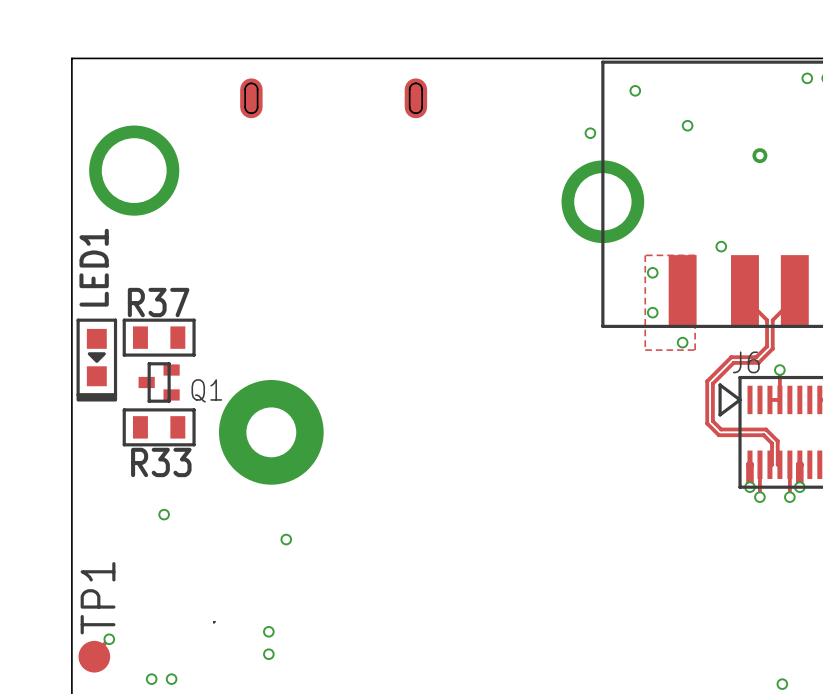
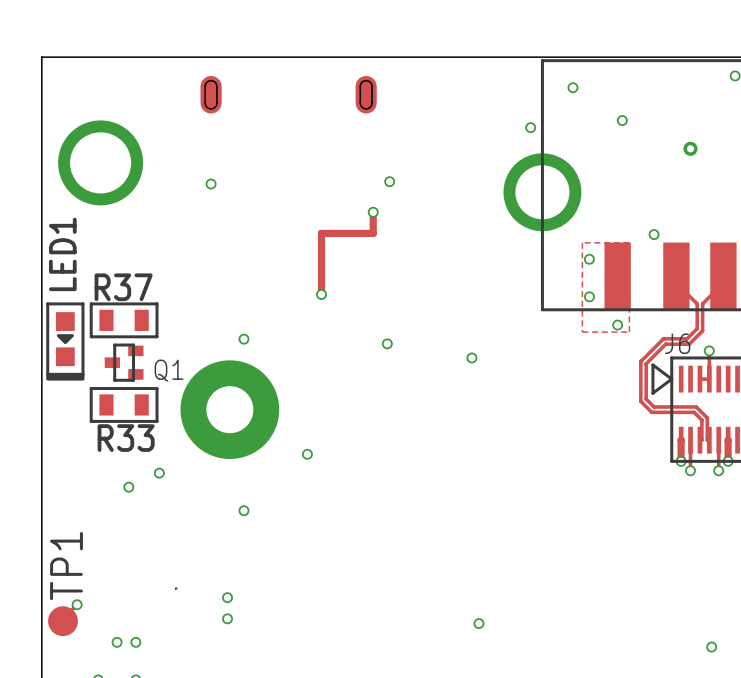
via: none -> (389, 181)
via: none -> (211, 184)
track: none -> (373, 212) (373, 233) (321, 233) (321, 294)
via: none -> (373, 212)
via: none -> (321, 294)
via: none -> (243, 339)
via: none -> (387, 343)
via: none -> (471, 357)
via: none -> (307, 454)
via: none -> (159, 473)
via: none -> (478, 623)

